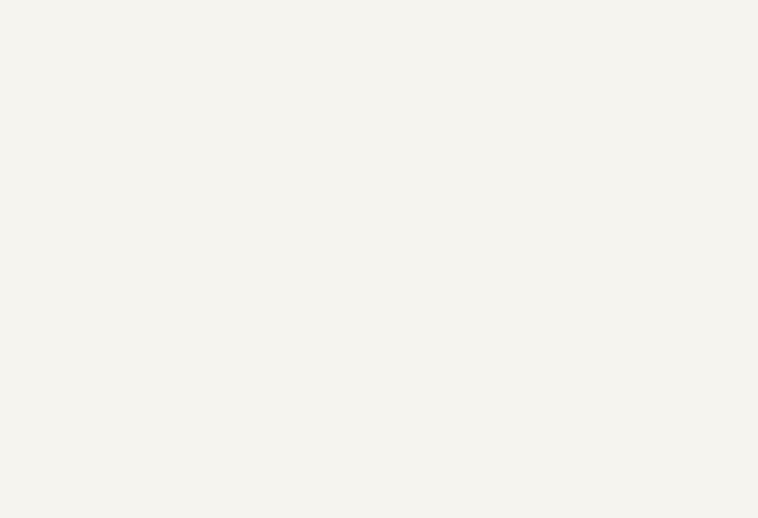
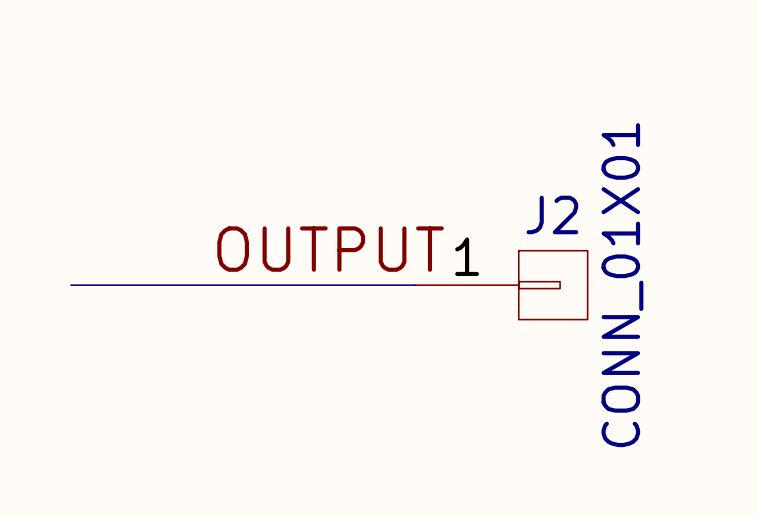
label: none -> OUTPUT (330, 249)
wire: none -> (70, 285) (415, 285)
J2: none -> CONN_01X01 (501, 285)

